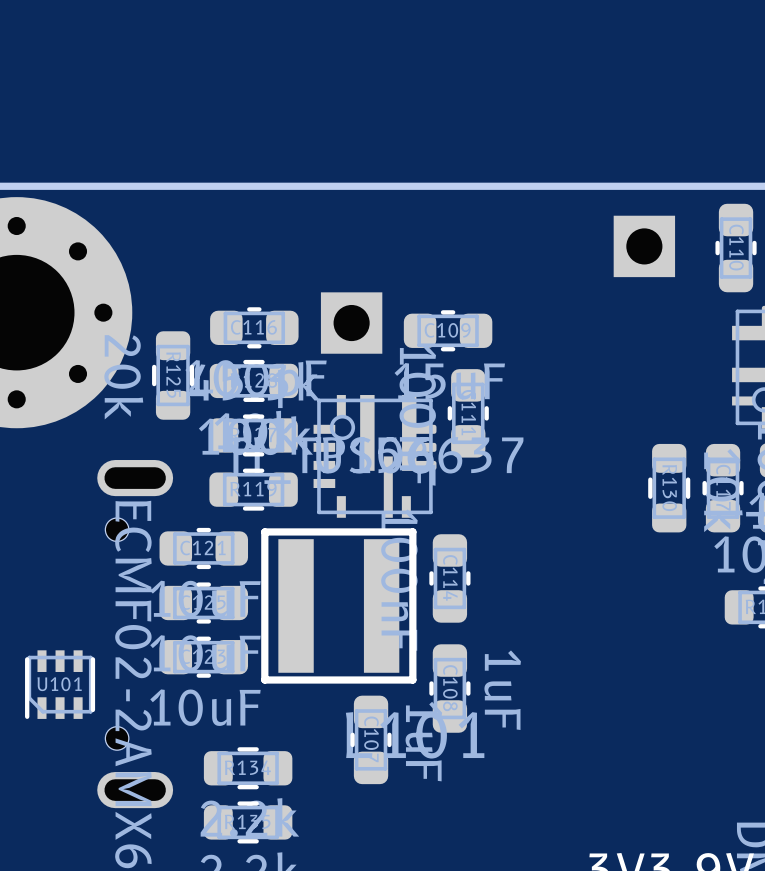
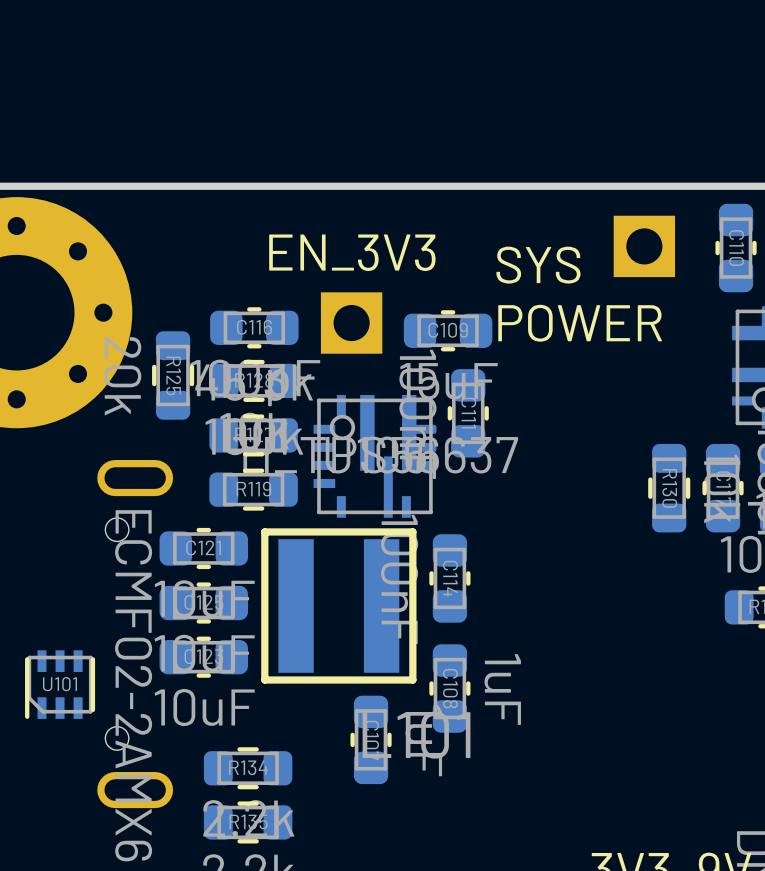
text: none -> EN_3V3 (352, 252)
text: none -> SYS (538, 265)
text: none -> POWER (580, 323)

